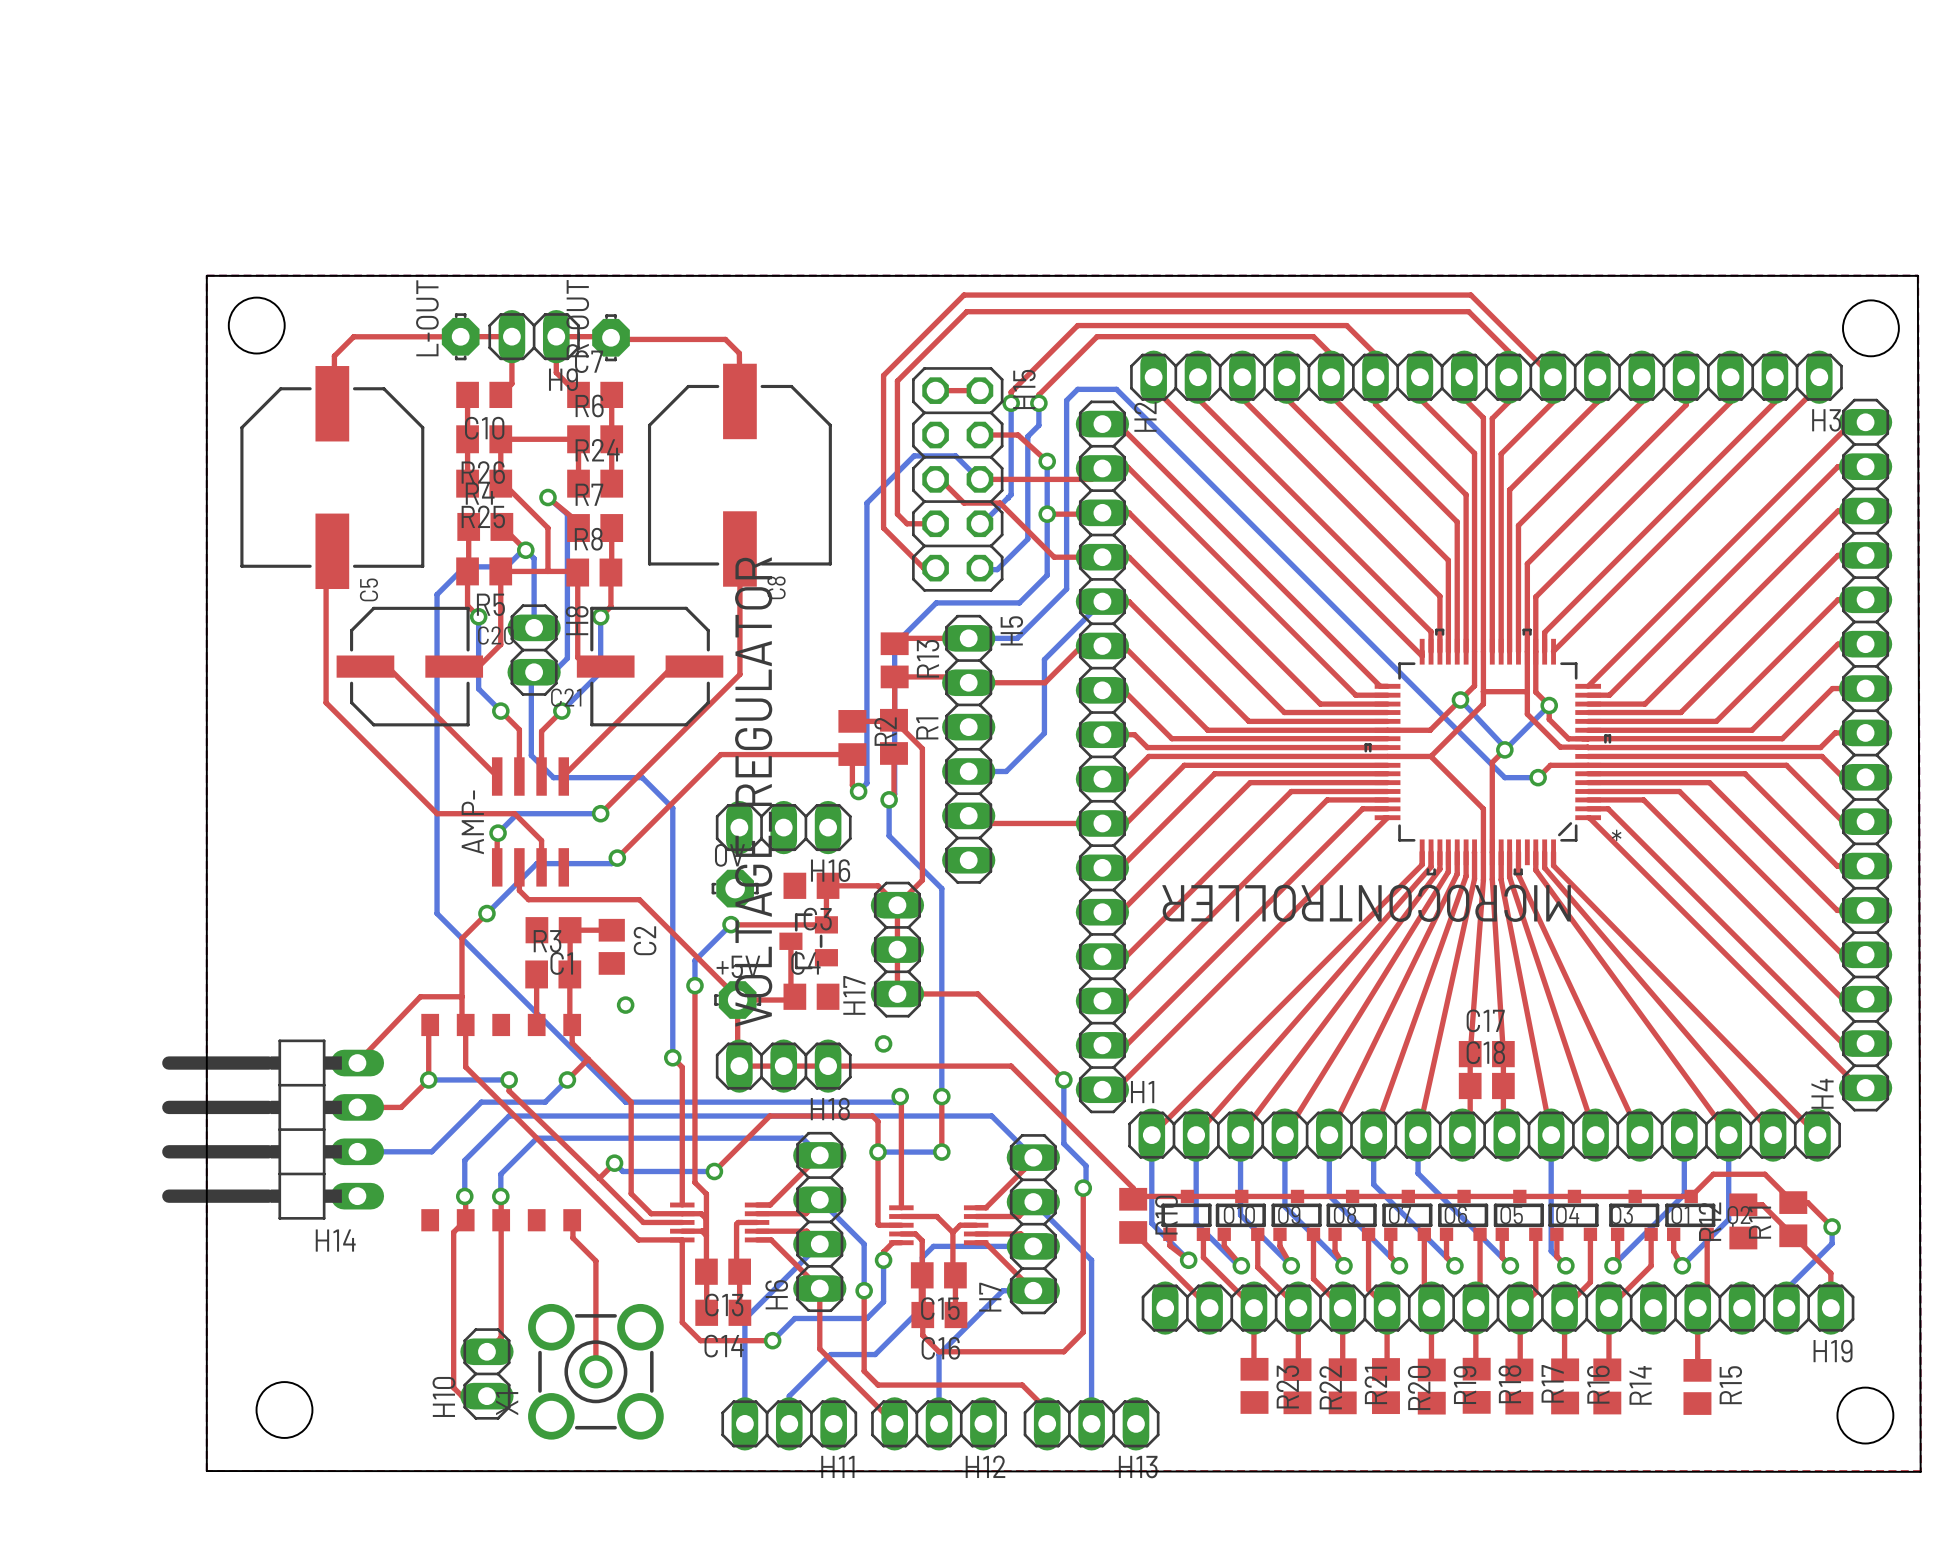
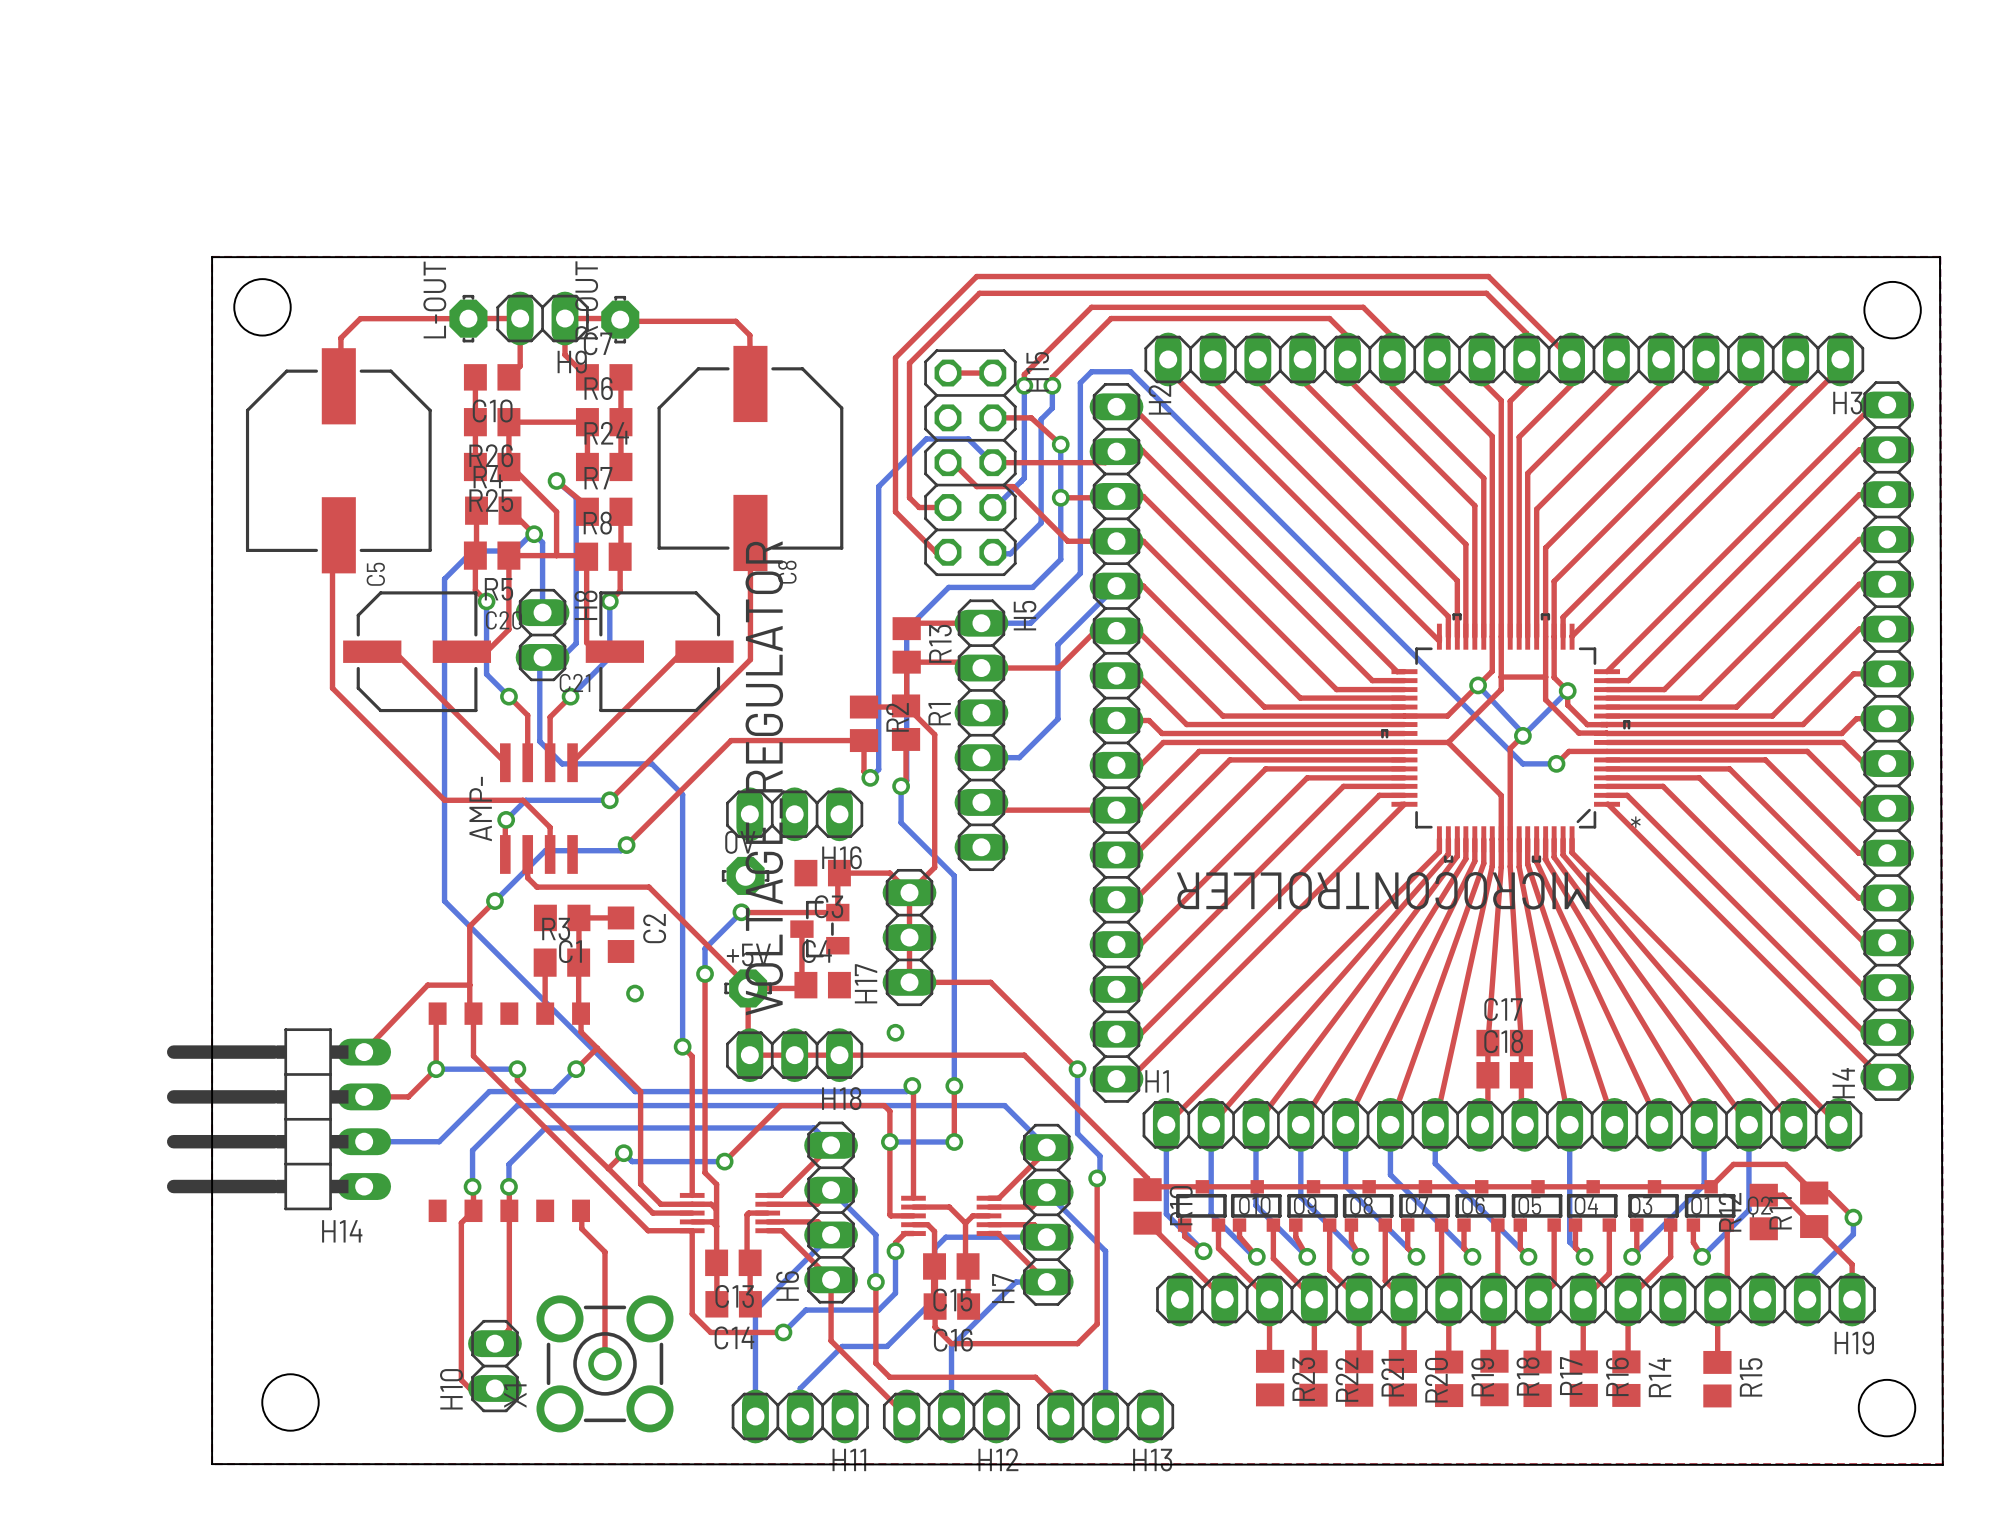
top track: none -> (1545, 839) (1545, 859) (1704, 1124)

